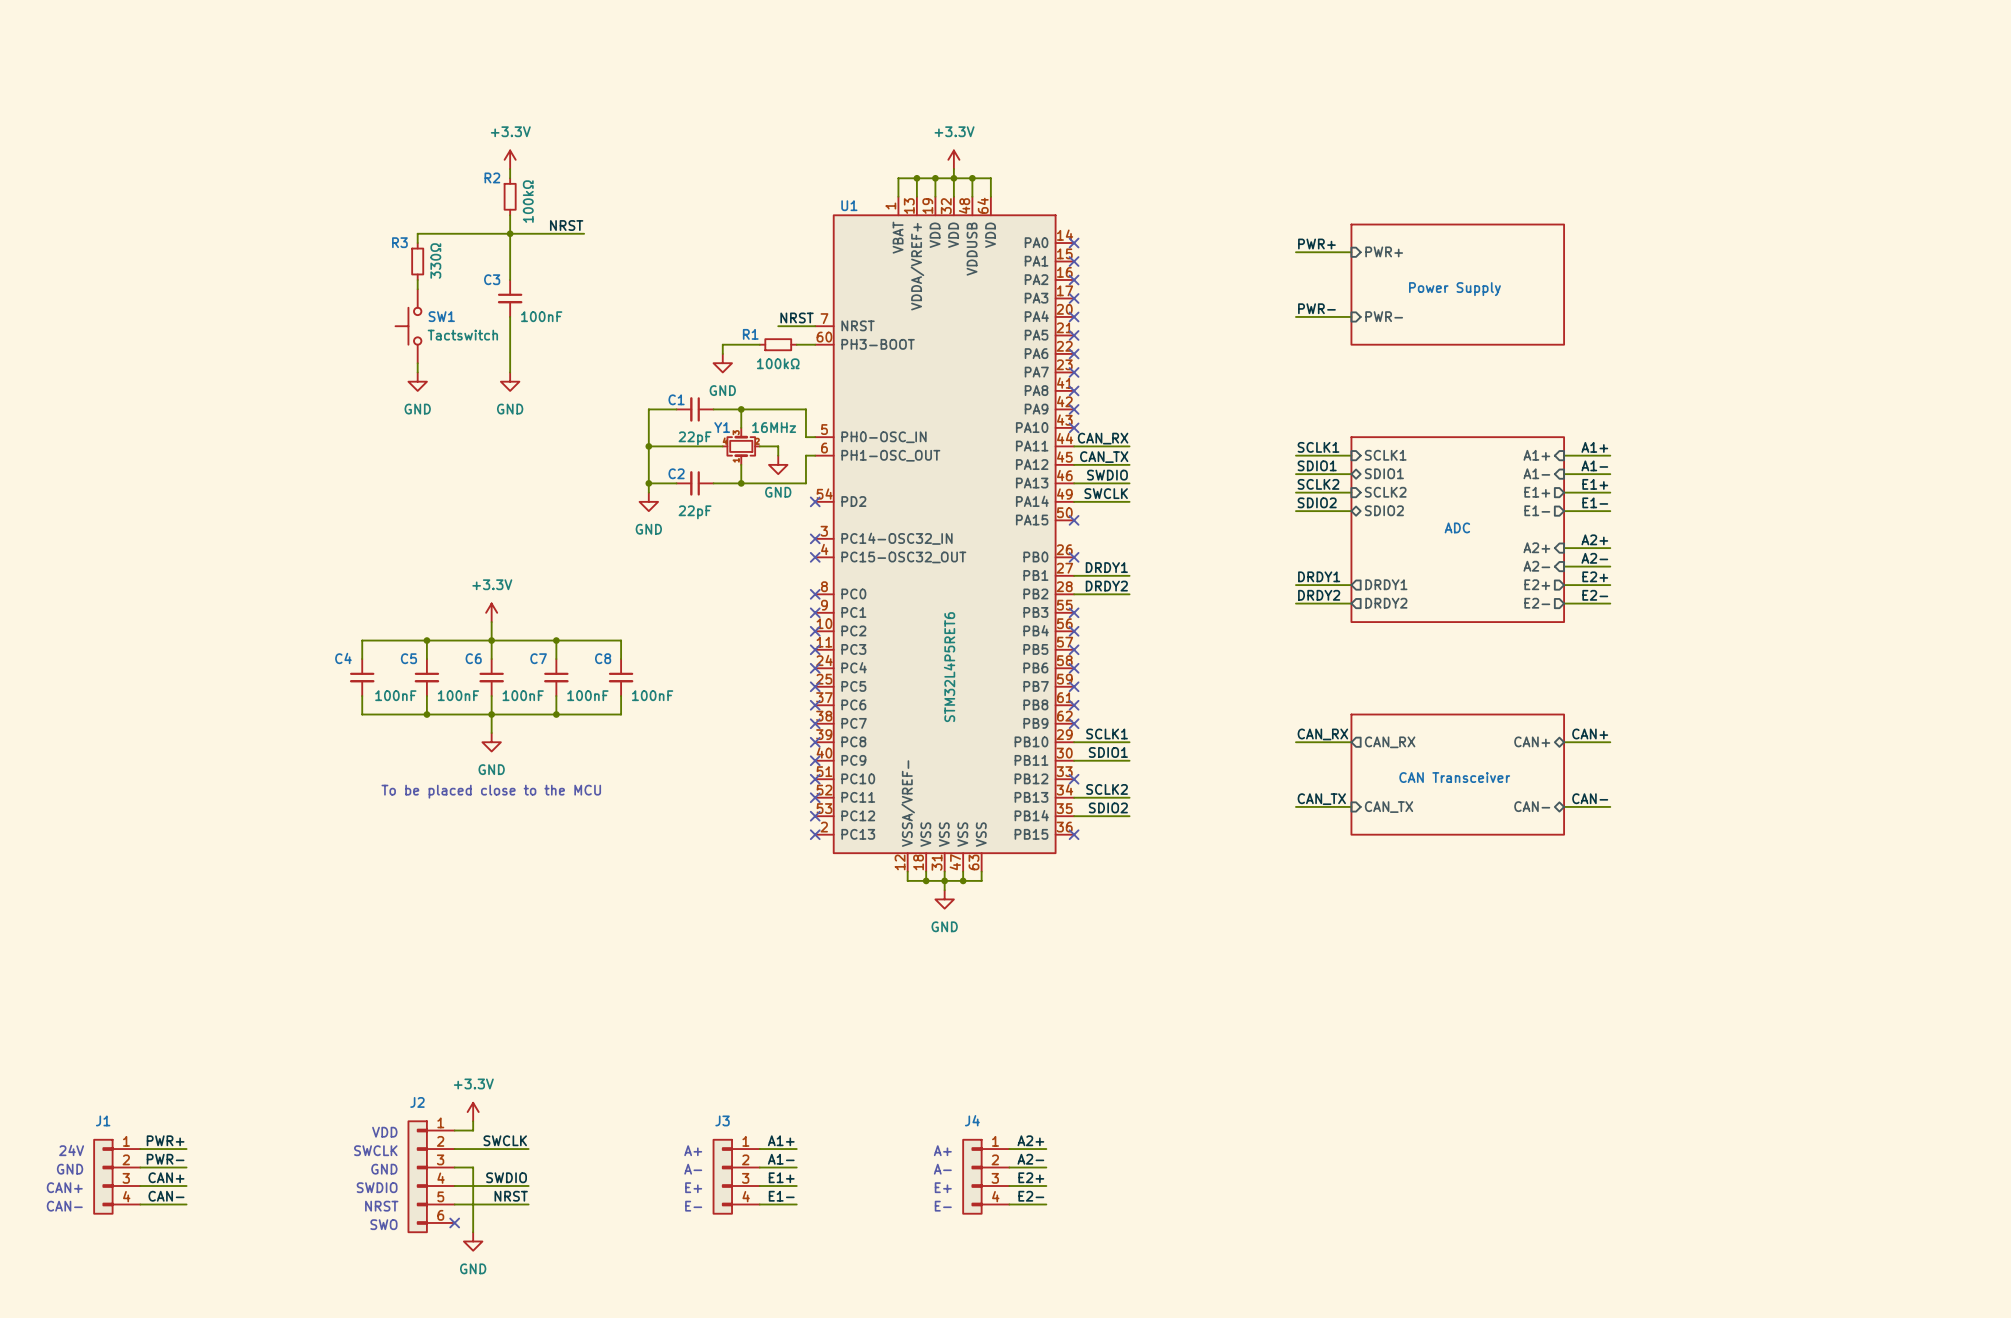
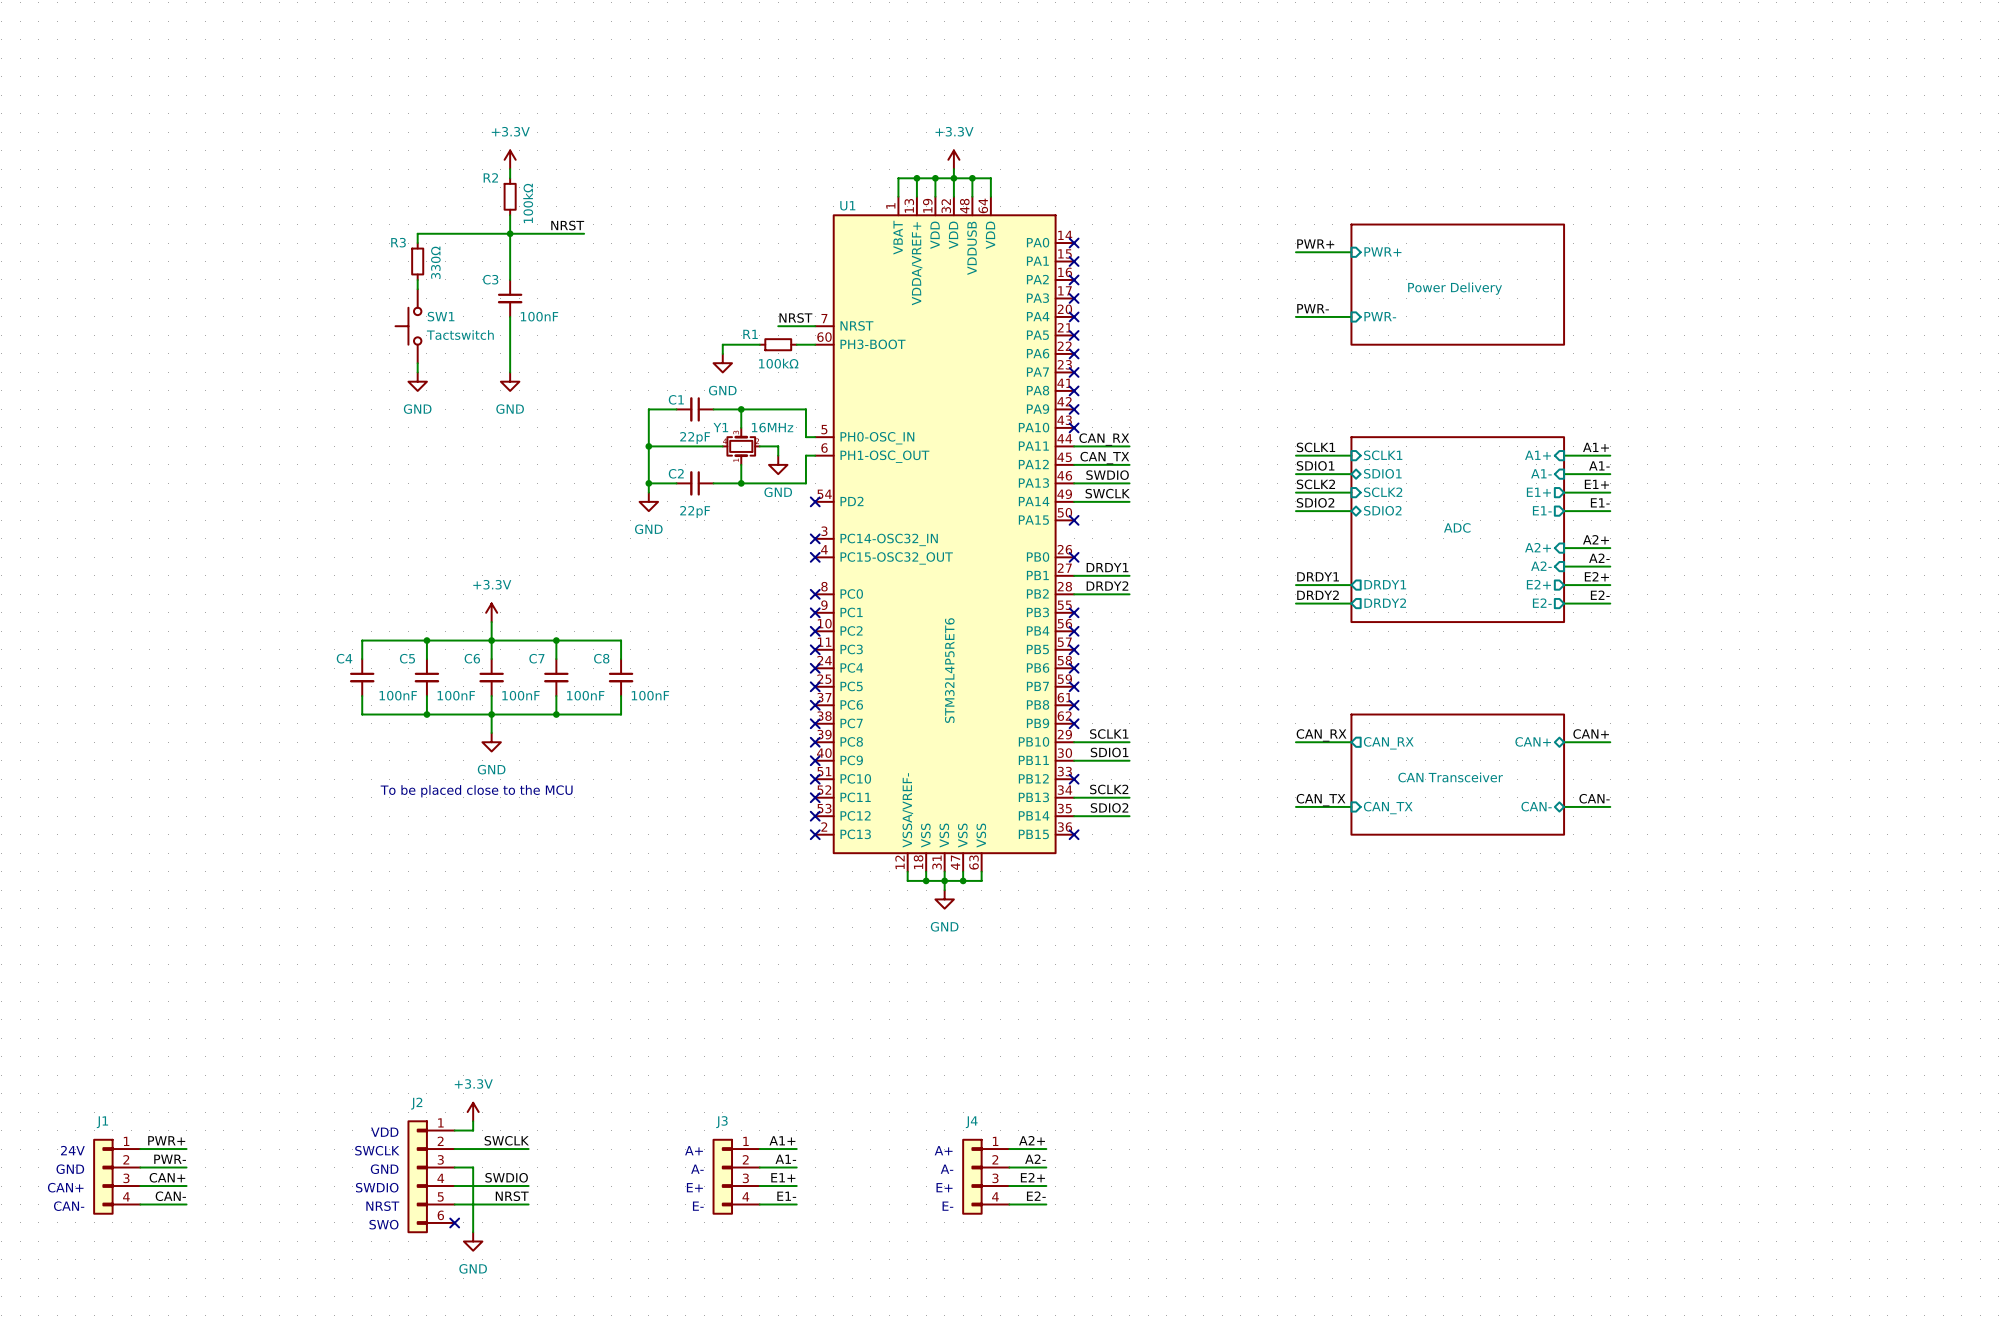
sheet Power Supply name: Power Supply (1454, 289) -> Power Delivery (1455, 288)

